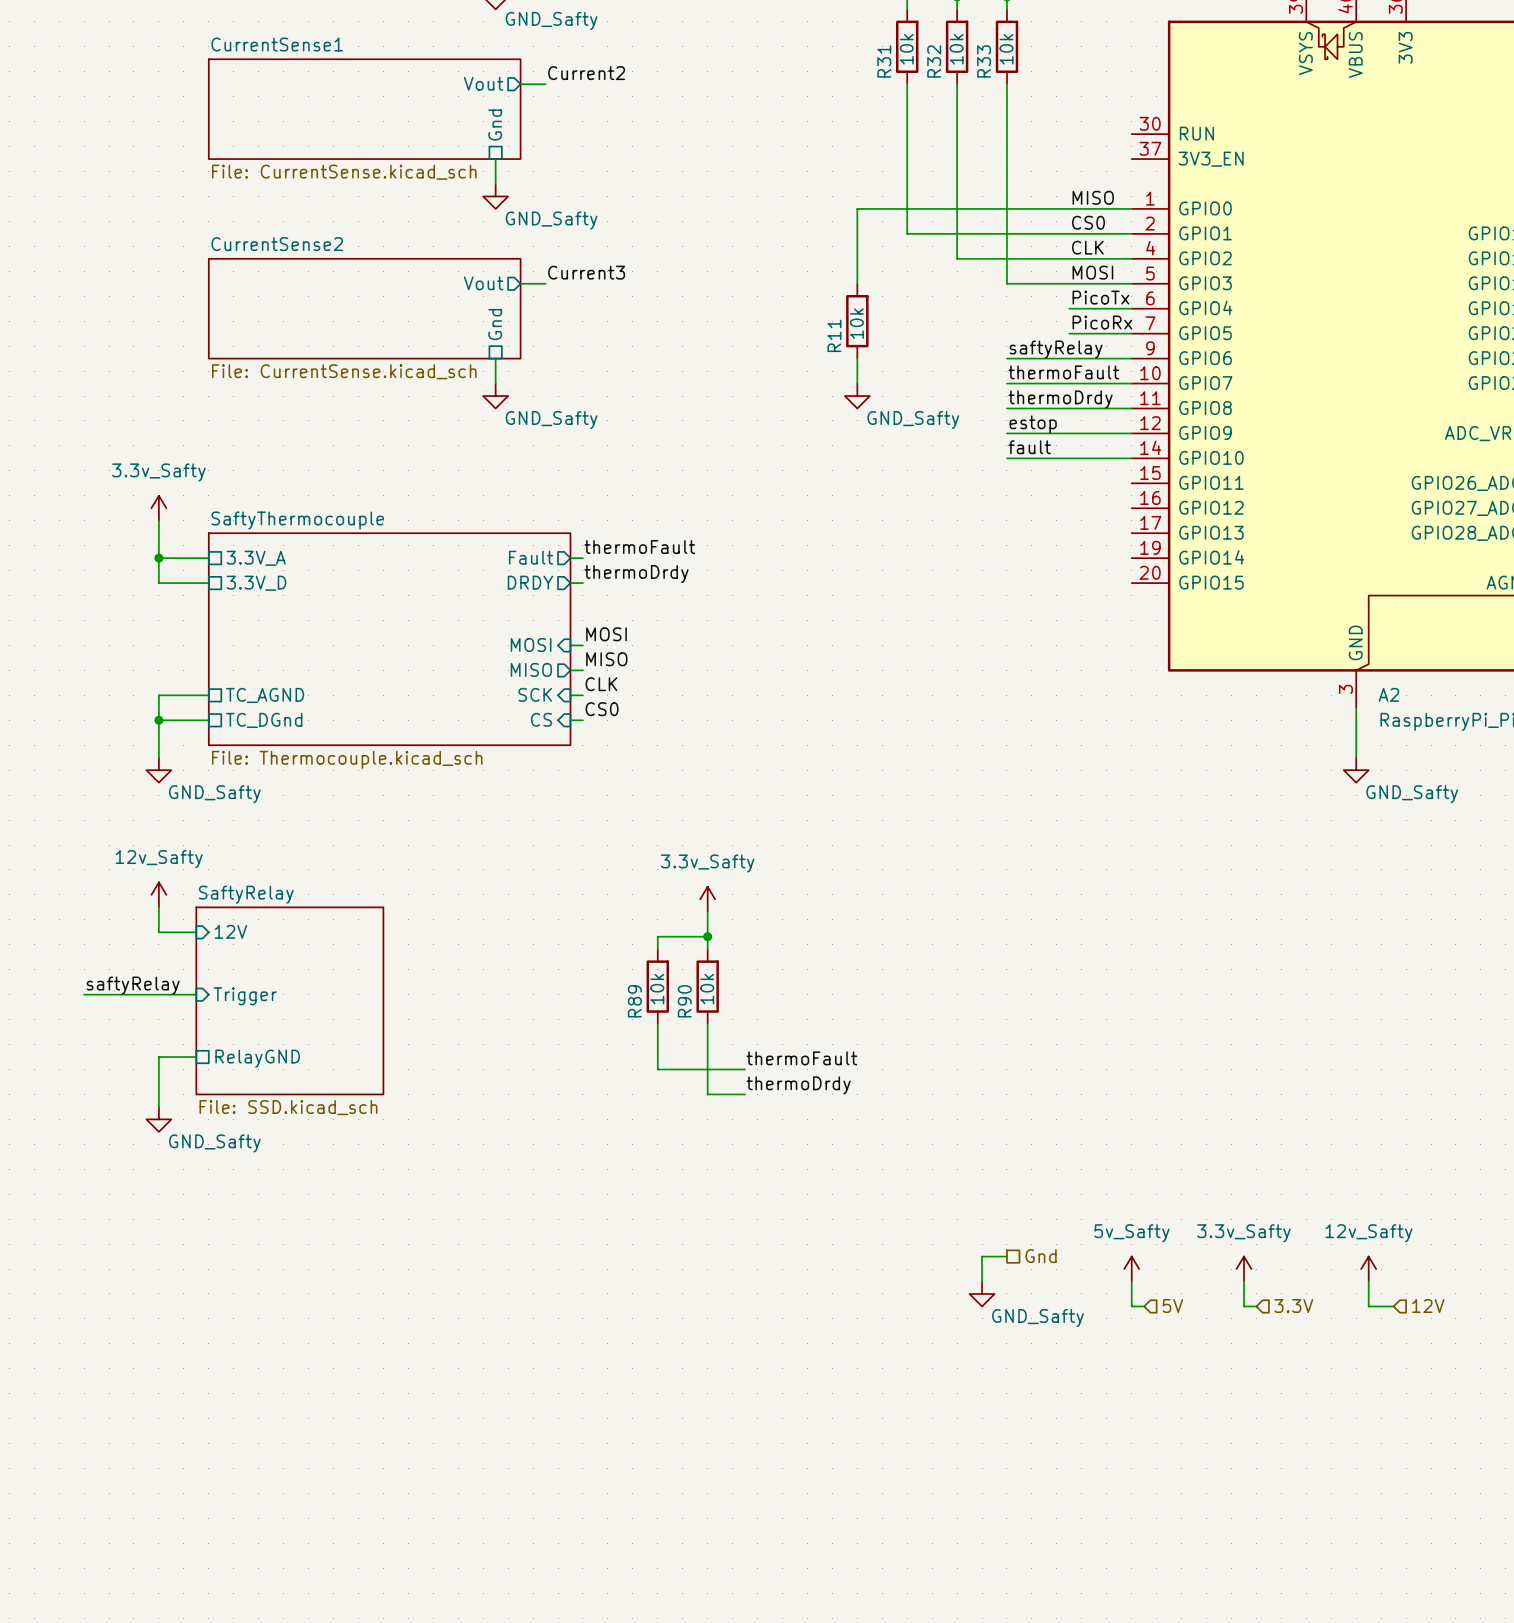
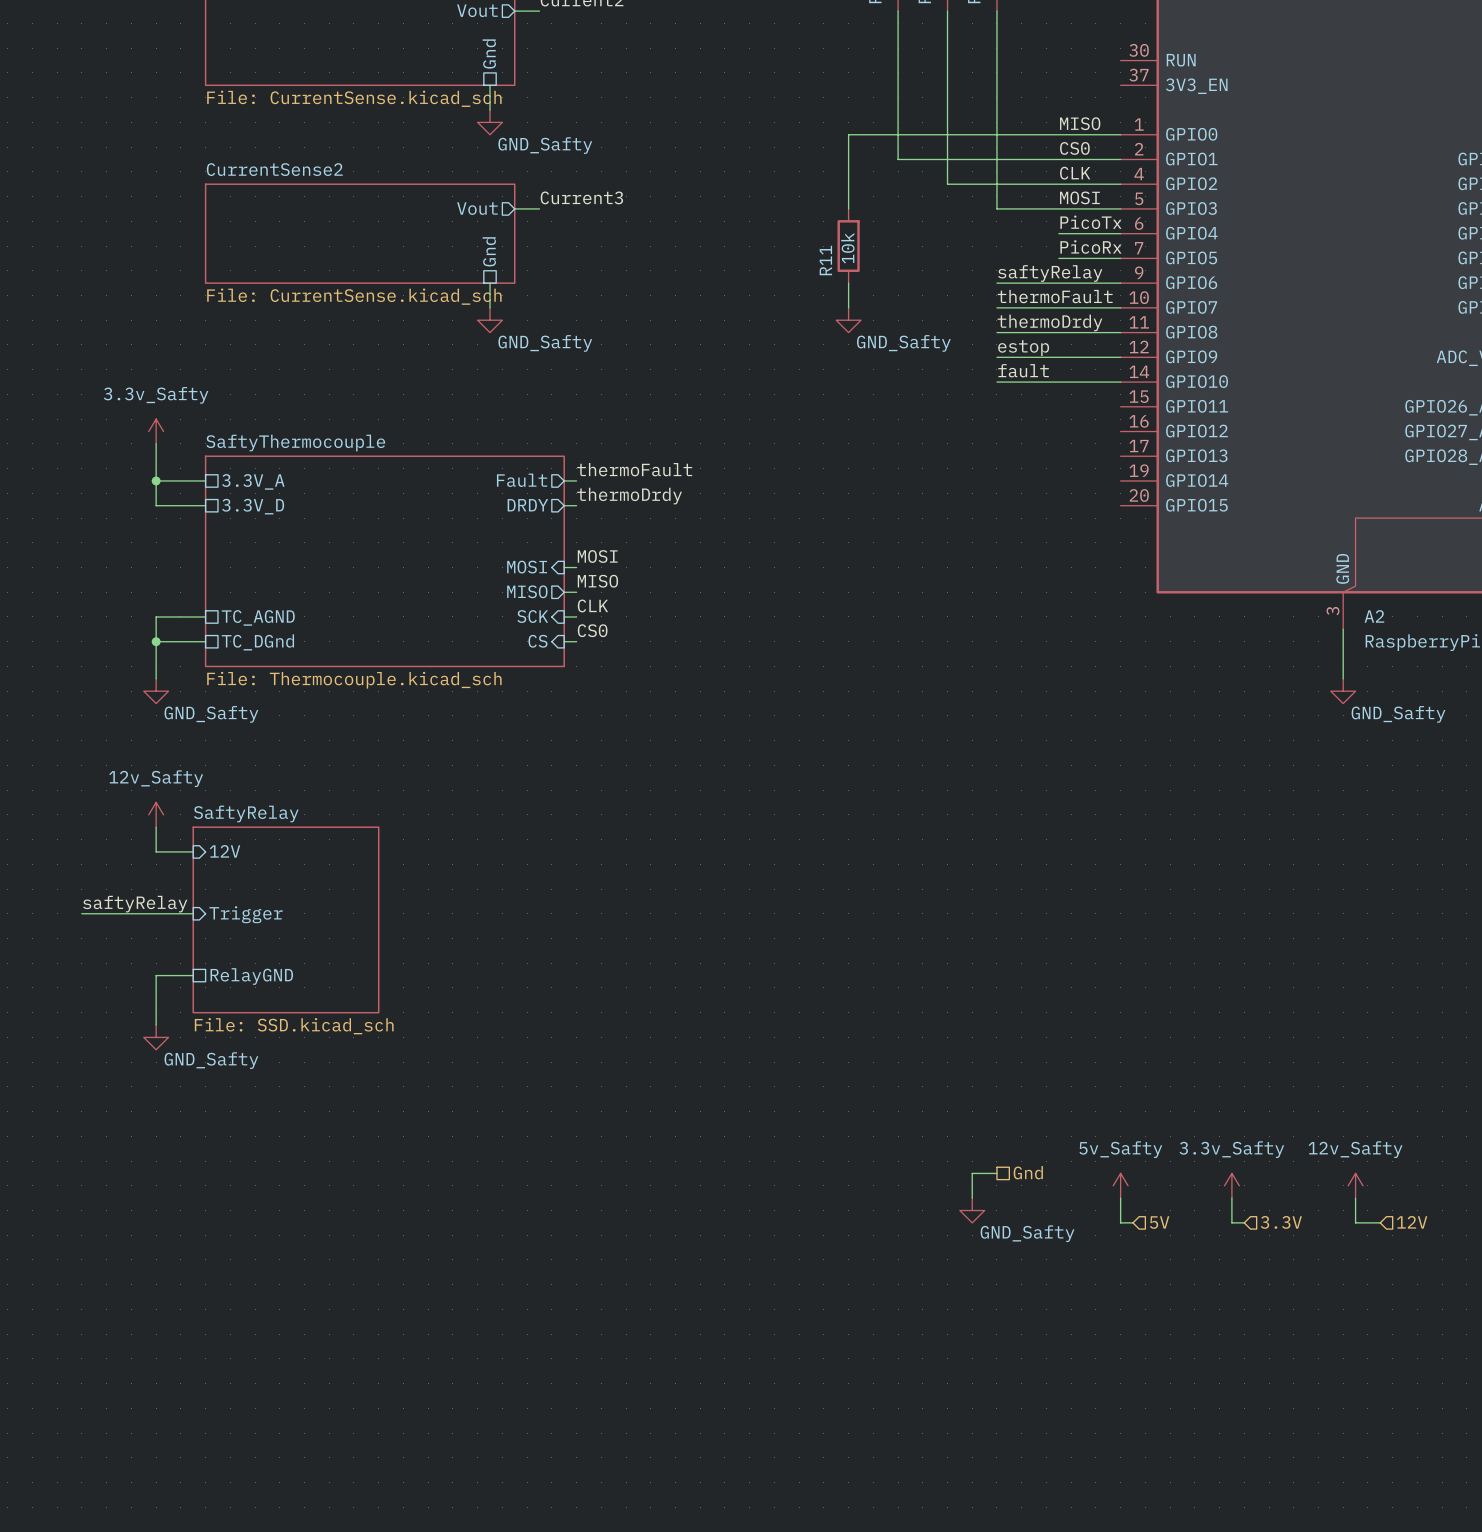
power symbol: 3.3v_Safty (707, 899) -> none
wire: (707, 911) (707, 949) -> none
wire: (707, 936) (657, 936) (657, 949) -> none
junction: (707, 936) -> none
R89: 10k (657, 986) -> none
R90: 10k (707, 986) -> none
wire: (657, 1024) (657, 1069) (745, 1069) -> none
wire: (707, 1024) (707, 1094) (745, 1094) -> none
label: thermoFault (801, 1058) -> none
label: thermoDrdy (798, 1085) -> none

